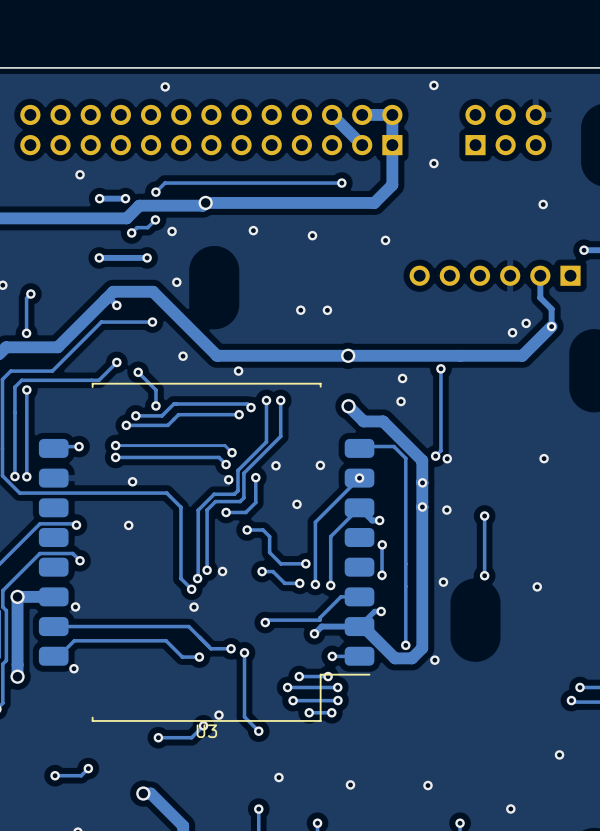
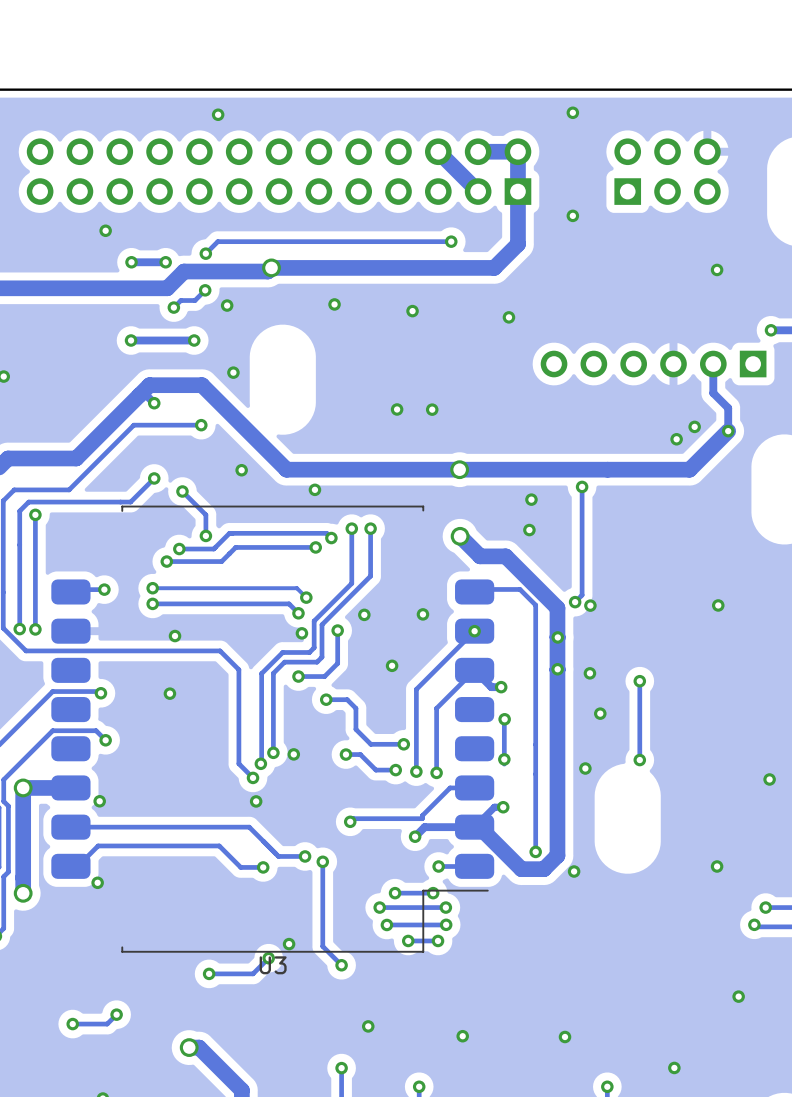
track: (30, 294) (26, 298) (26, 333) -> none
via: (30, 294) -> none
via: (26, 333) -> none
via: none -> (600, 713)
via: (537, 586) -> none
via: none -> (769, 779)
via: none -> (717, 866)

